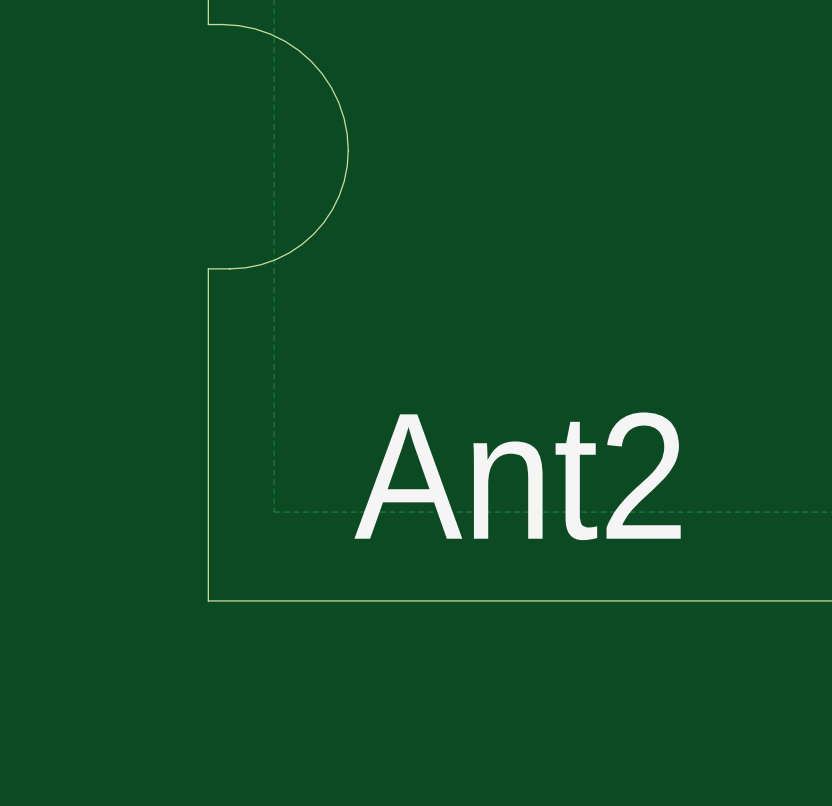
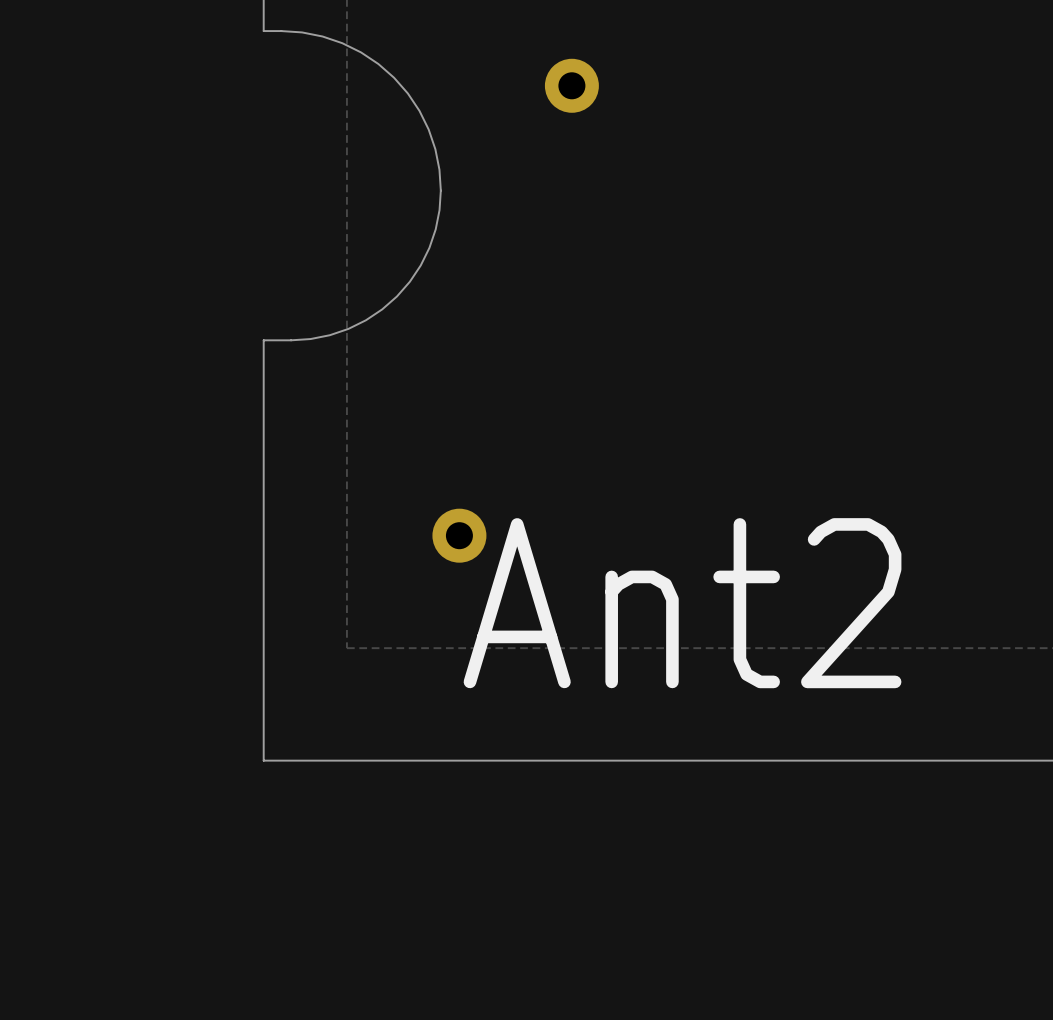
via: none -> (571, 85)
via: none -> (459, 535)

